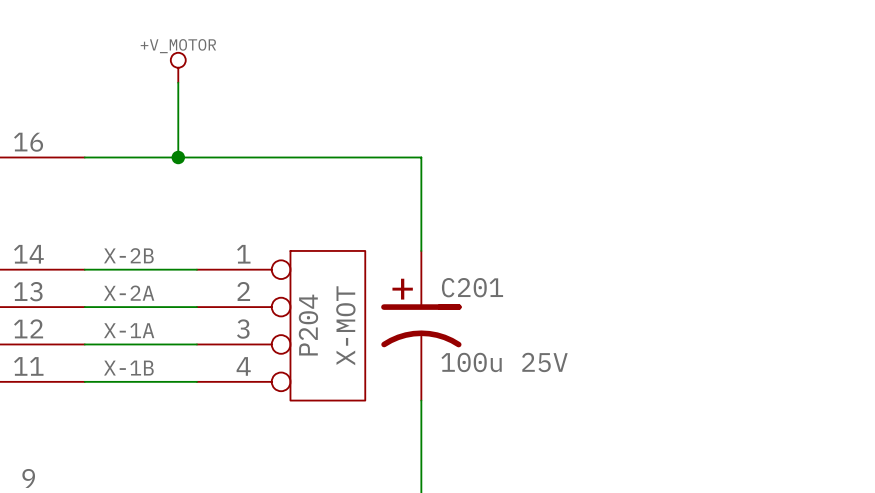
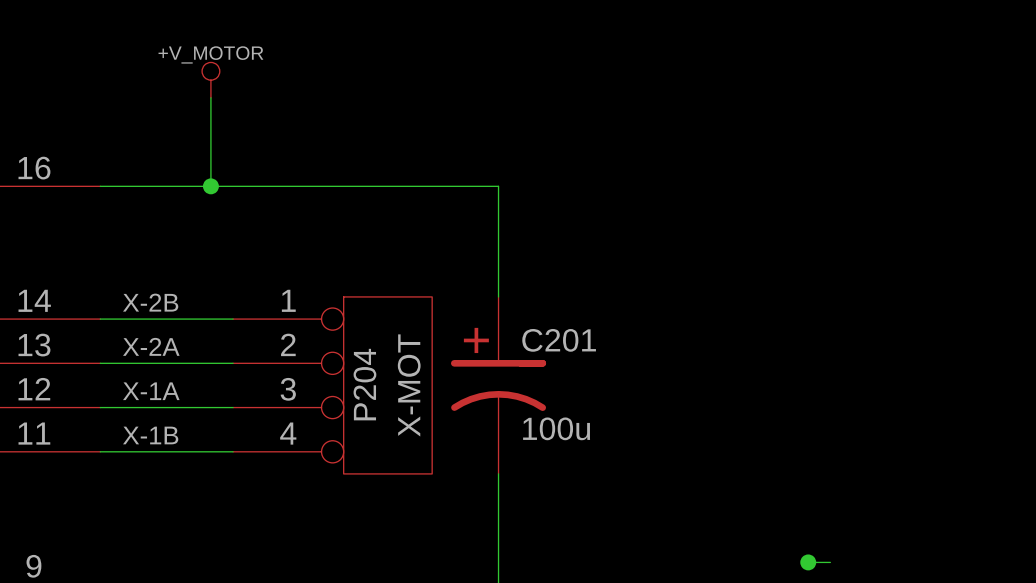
C201 value: 100u 25V (504, 362) -> 100u (556, 428)
wire: none -> (808, 562) (830, 562)
junction: none -> (808, 562)

